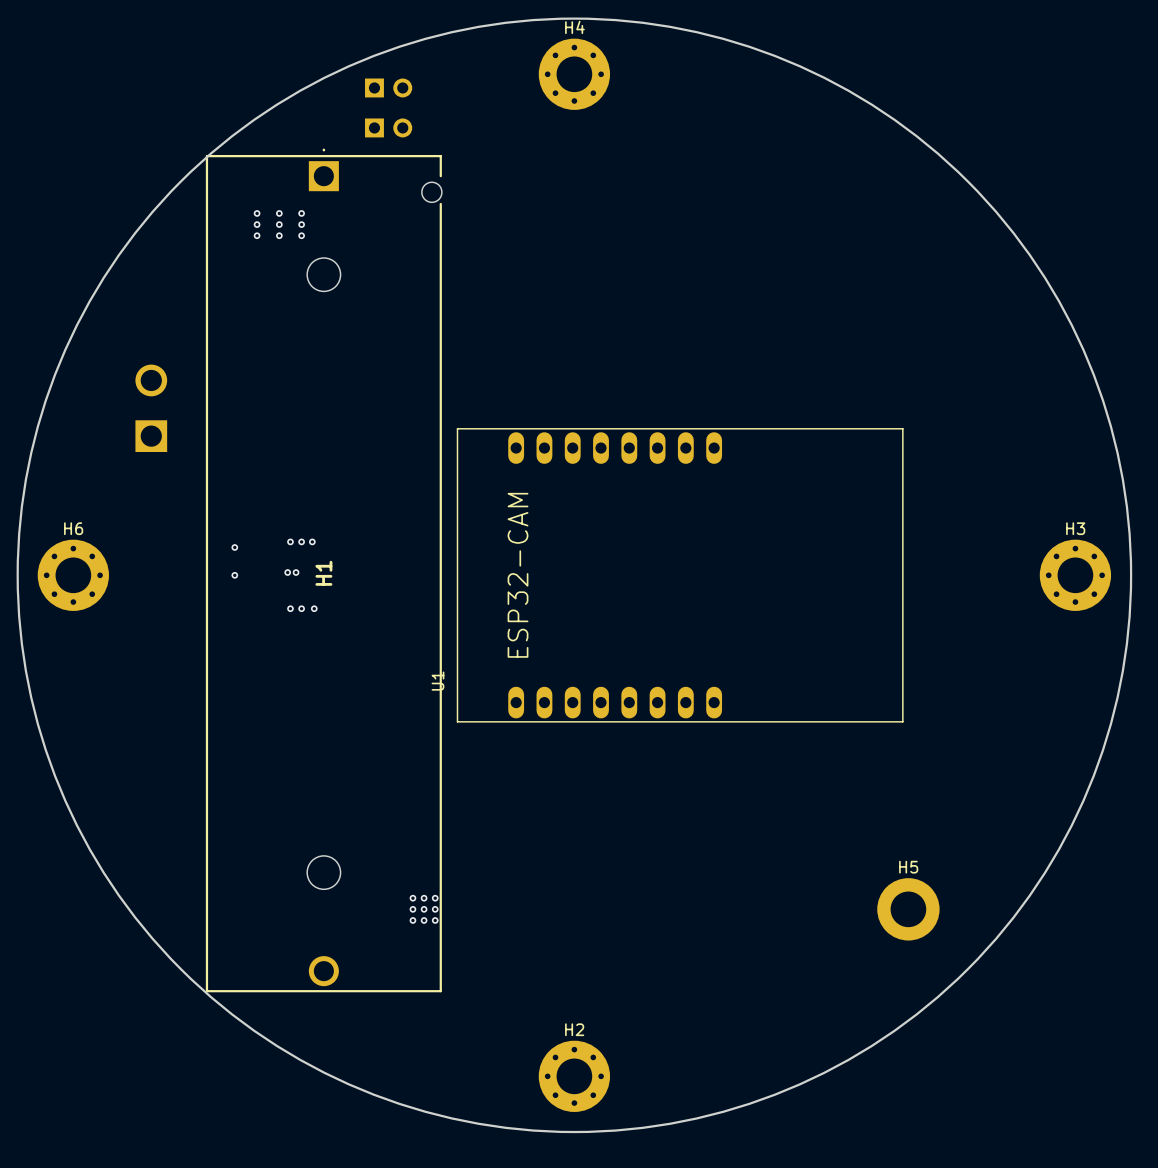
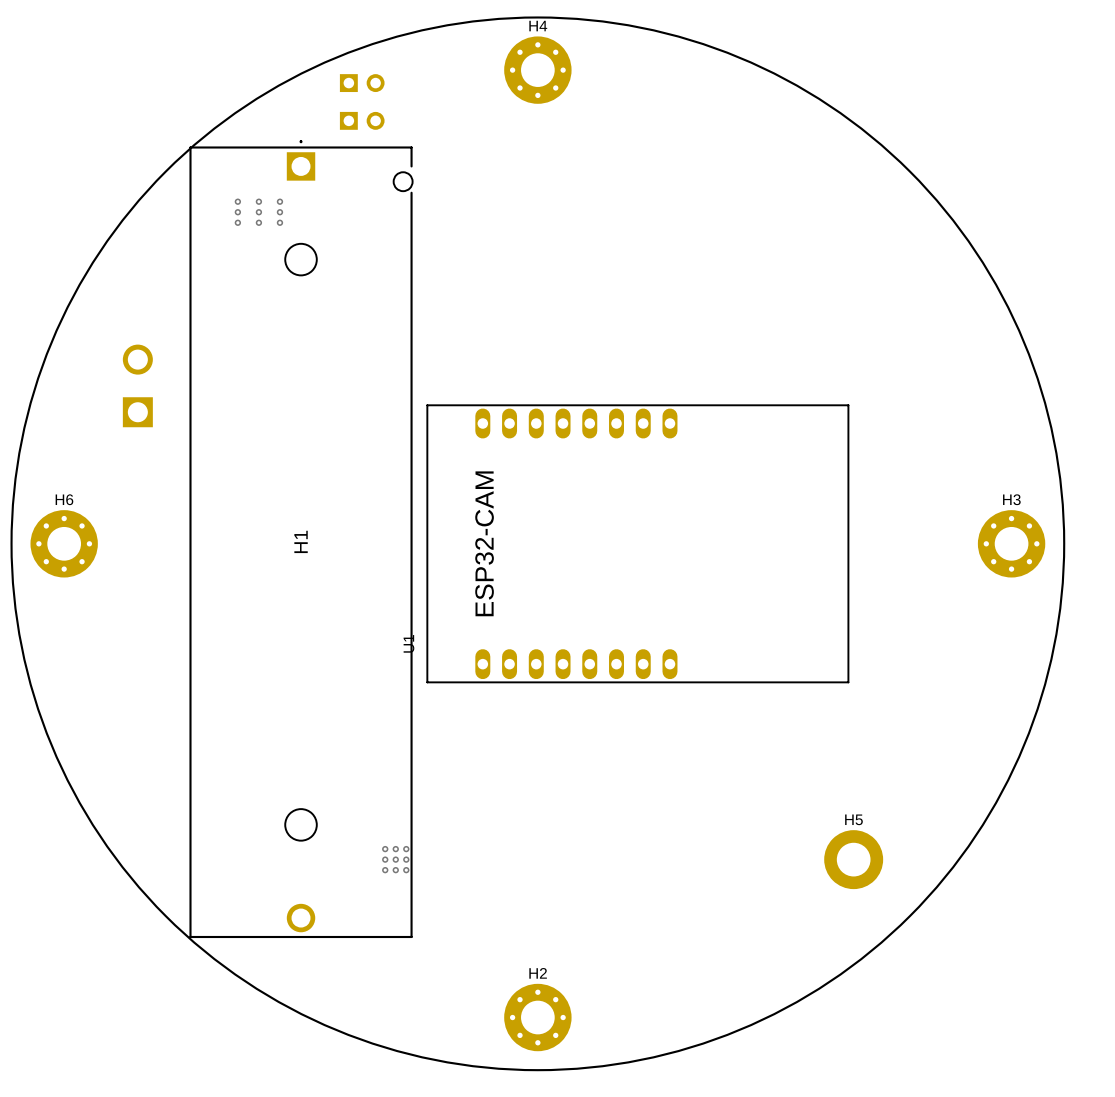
via: (290, 541) -> none
via: (301, 541) -> none
via: (312, 541) -> none
via: (234, 547) -> none
via: (287, 572) -> none
via: (296, 572) -> none
via: (234, 575) -> none
via: (290, 608) -> none
via: (301, 608) -> none
via: (314, 608) -> none

